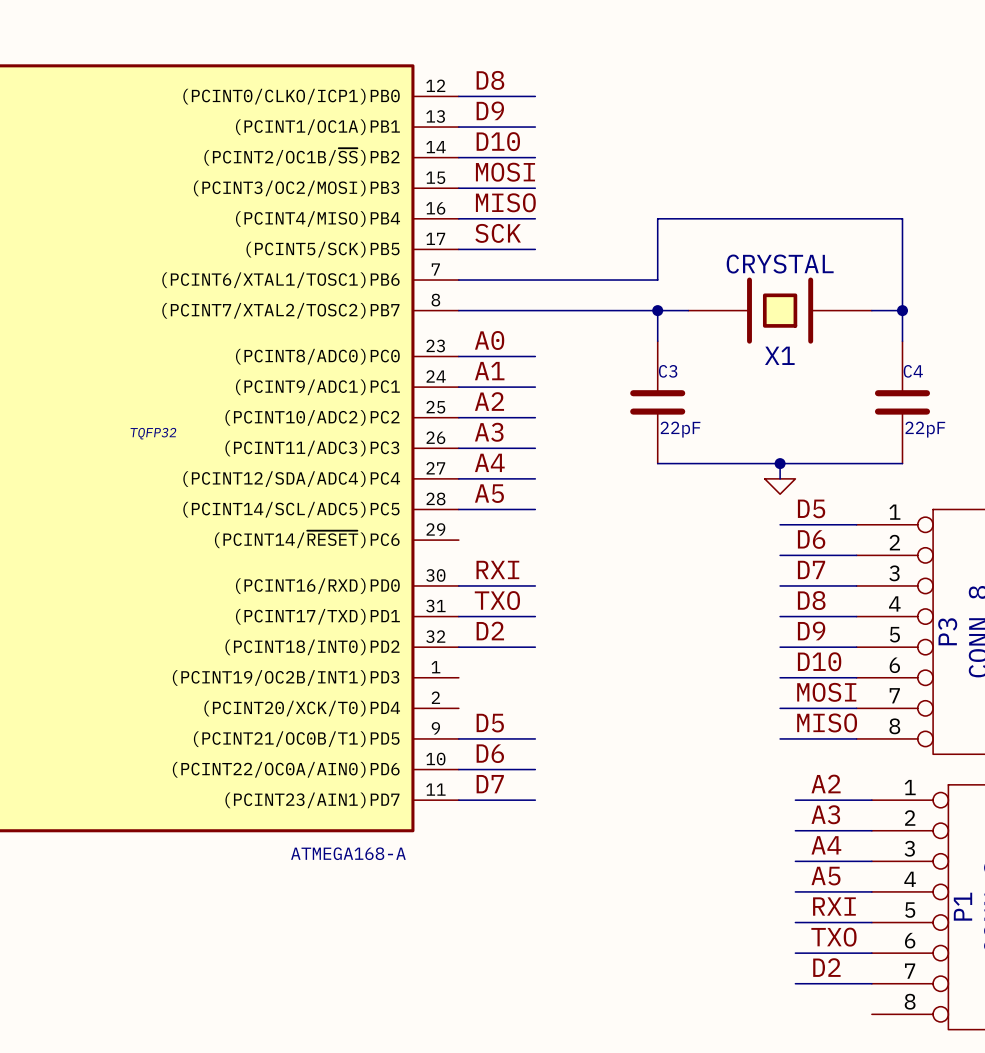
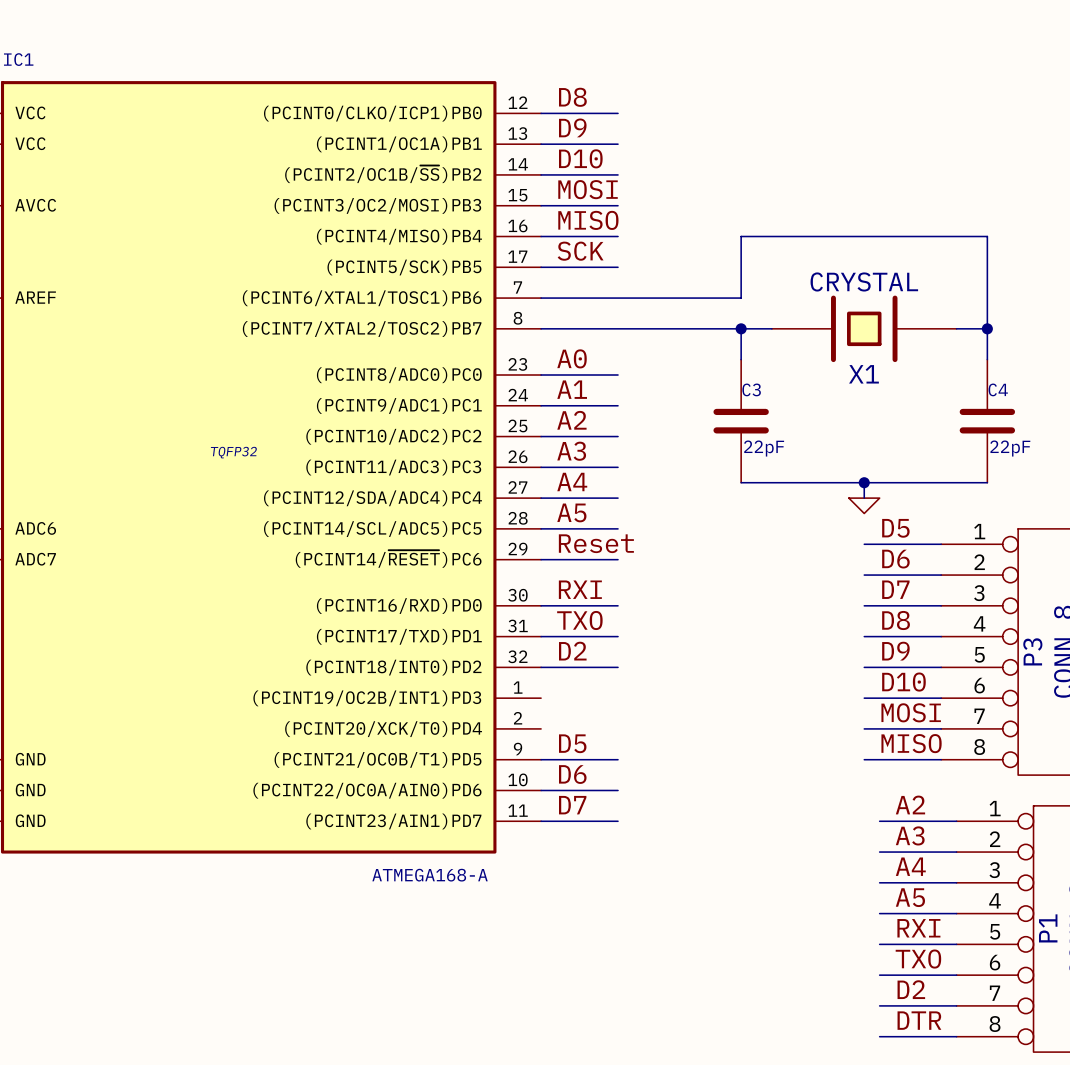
label: none -> Reset (596, 543)
wire: none -> (541, 559) (618, 559)
label: none -> DTR (919, 1020)
wire: none -> (879, 1036) (956, 1036)

